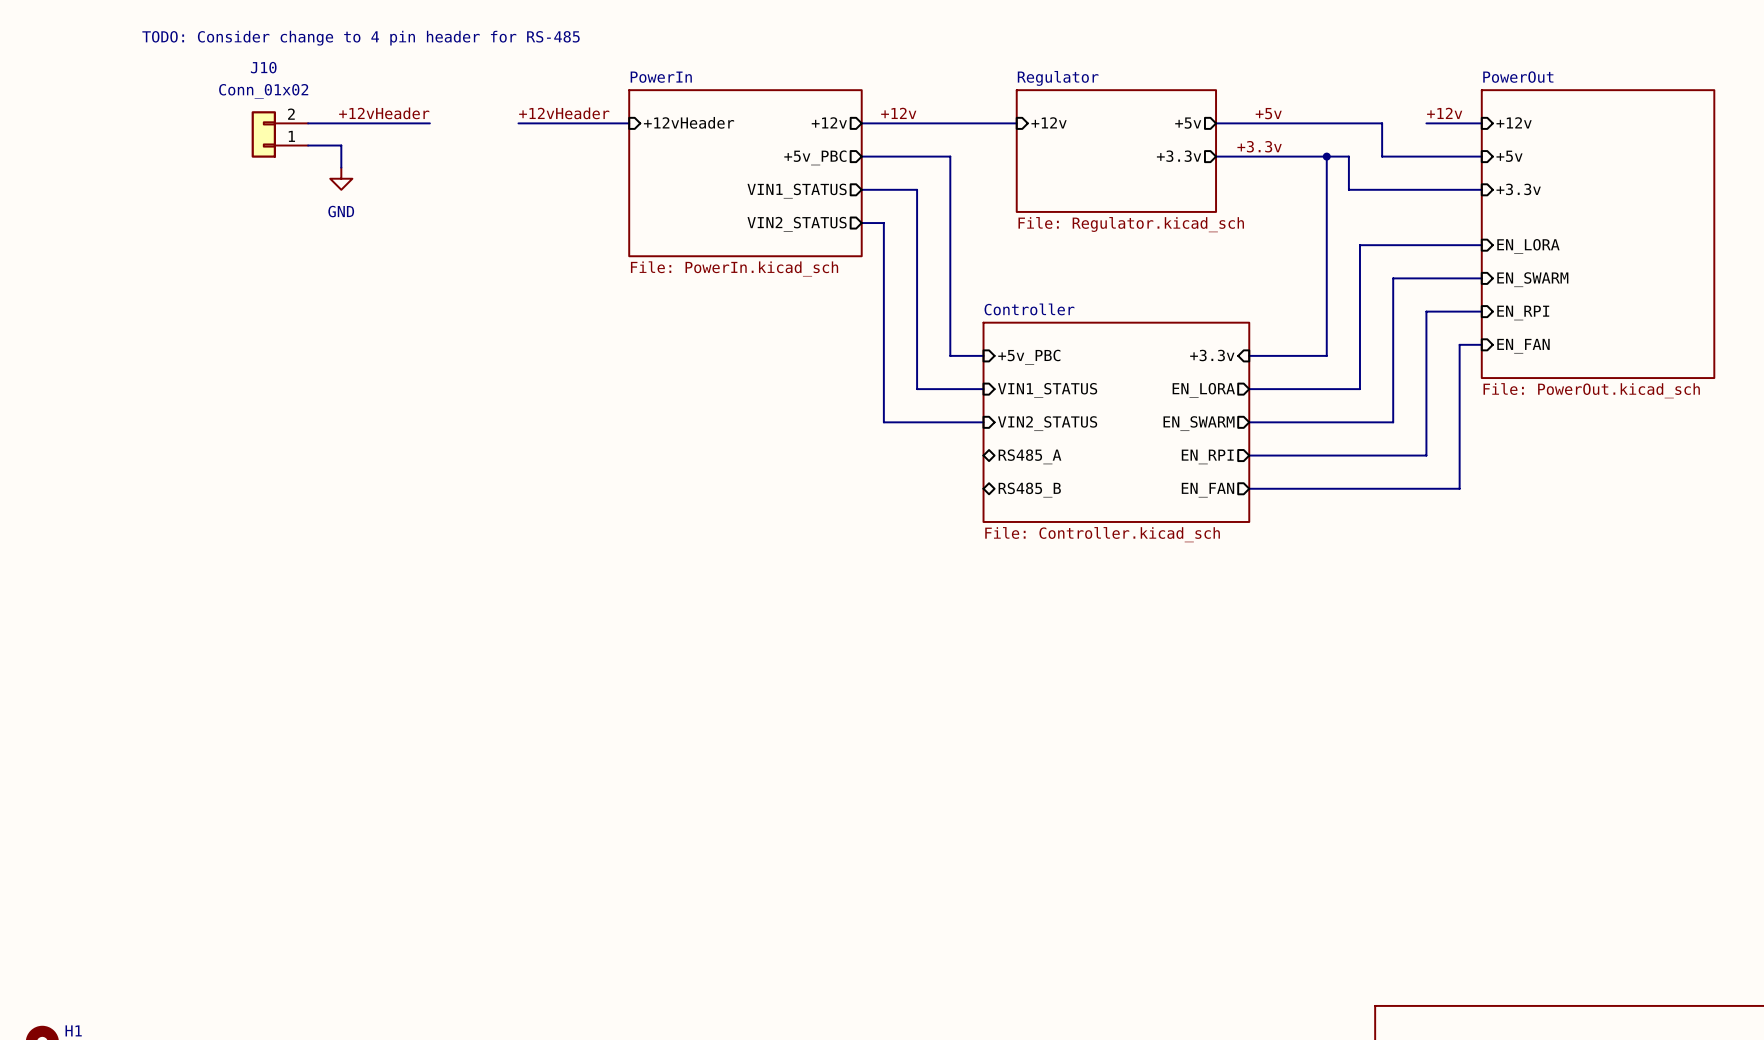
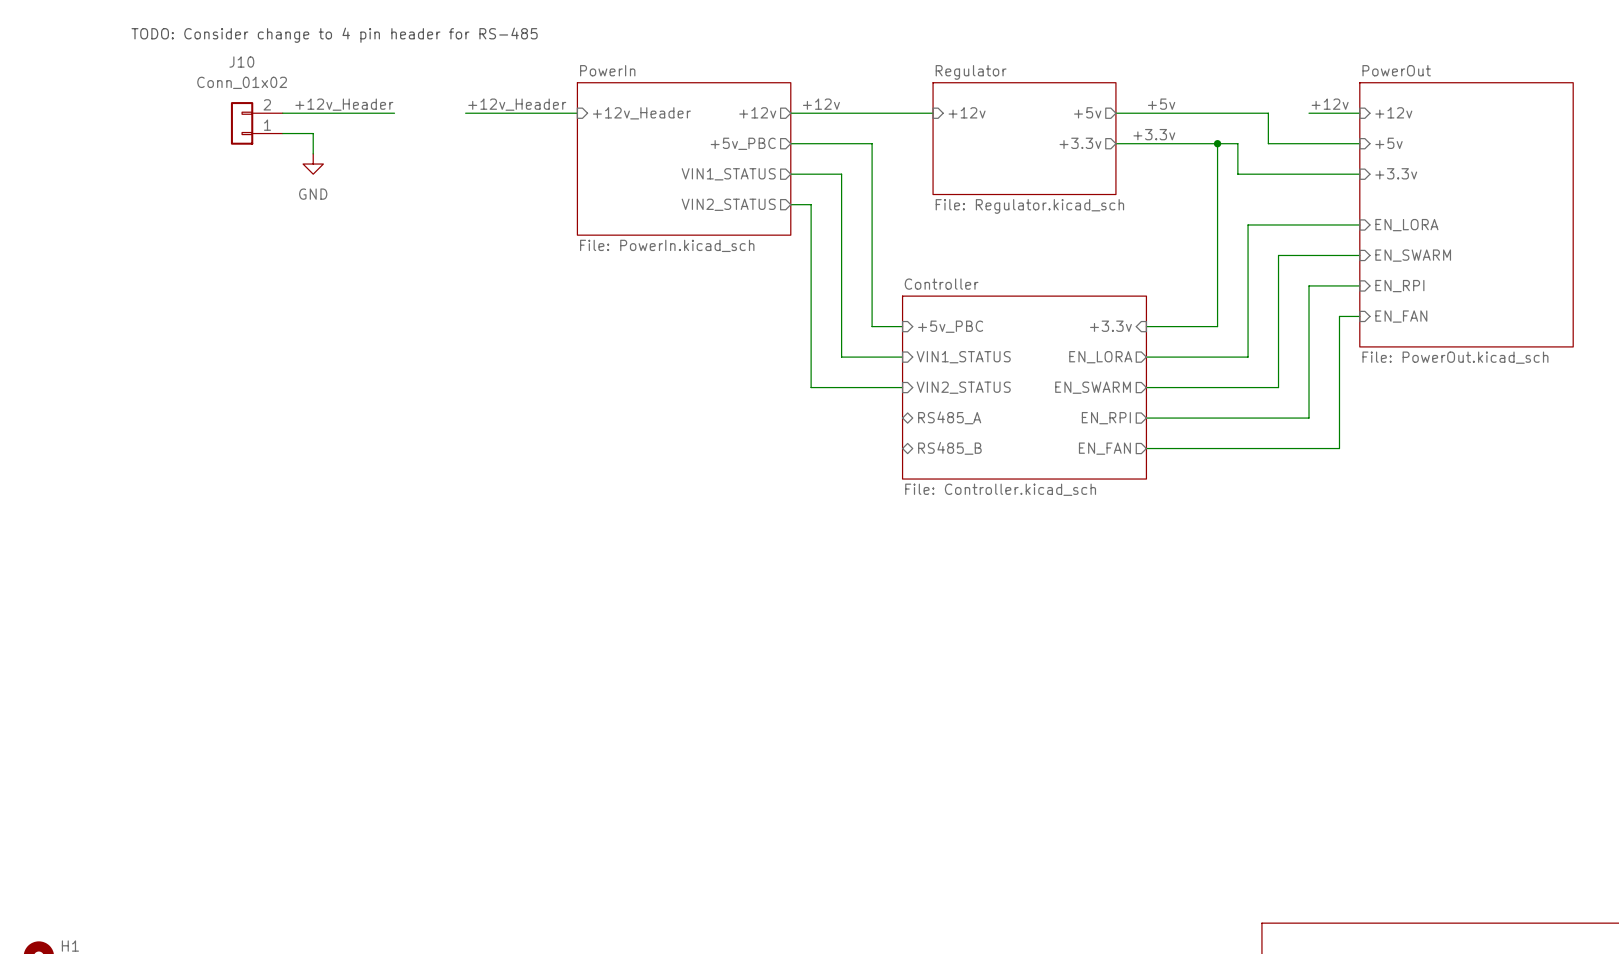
label: +12vHeader (384, 113) -> +12v_Header (344, 104)
label: +12vHeader (564, 113) -> +12v_Header (517, 104)
sheet pin: +12vHeader (689, 122) -> +12v_Header (641, 113)
wire: none -> (465, 113) (475, 113)

